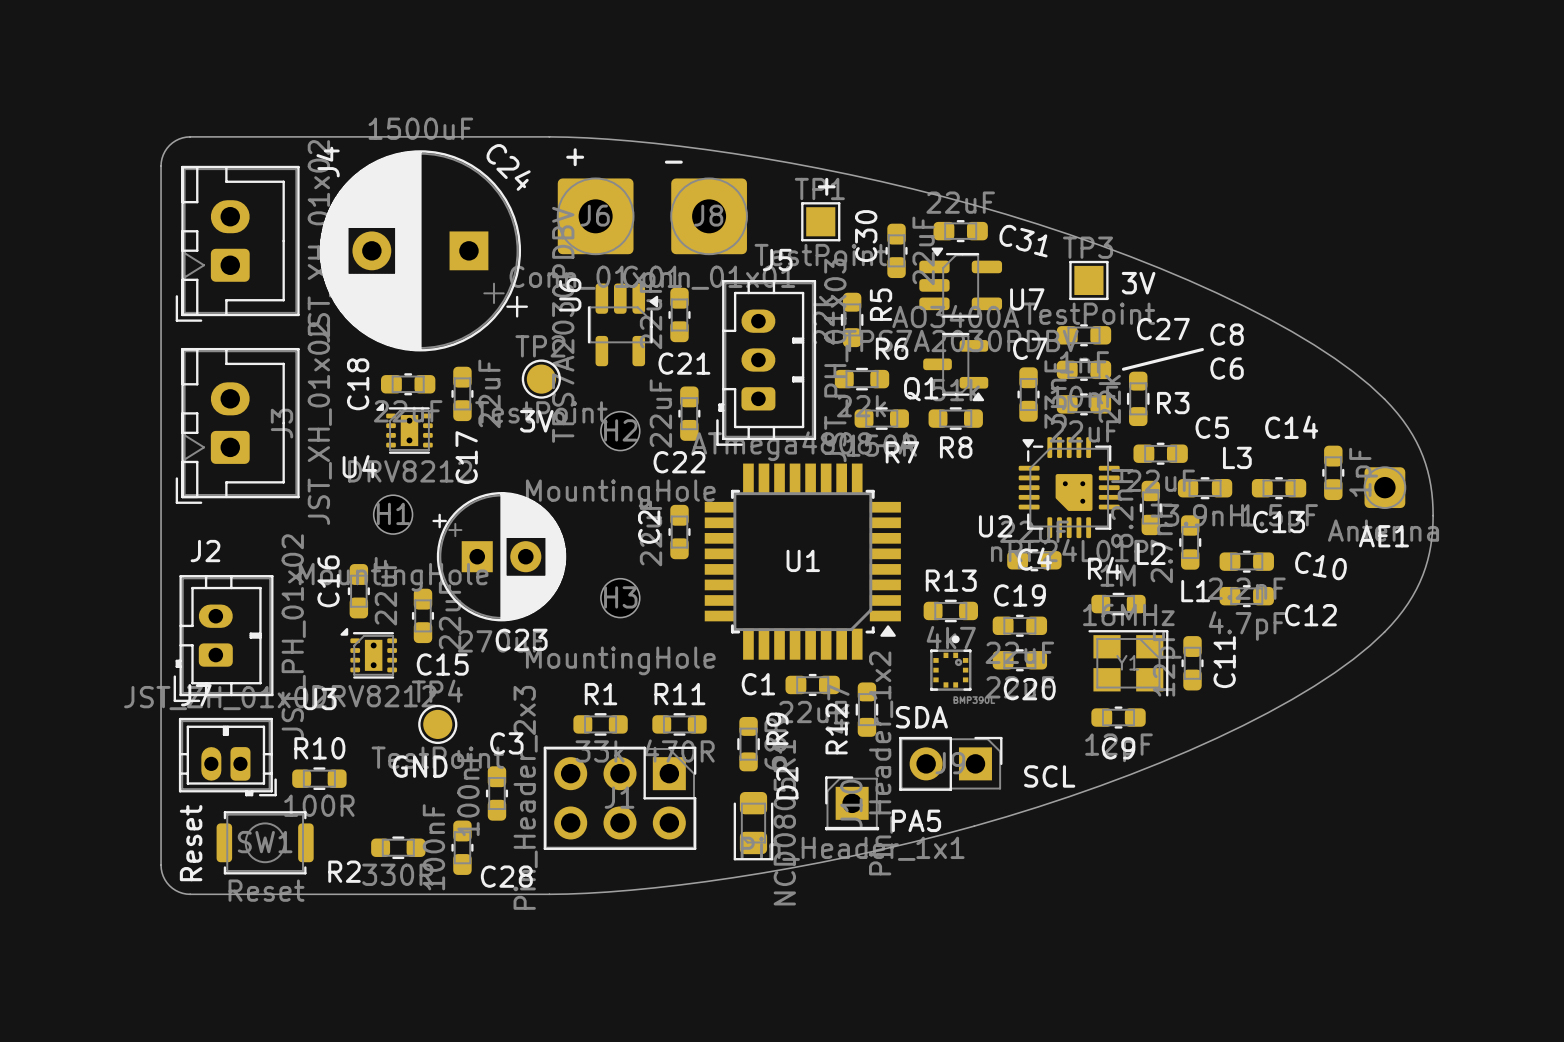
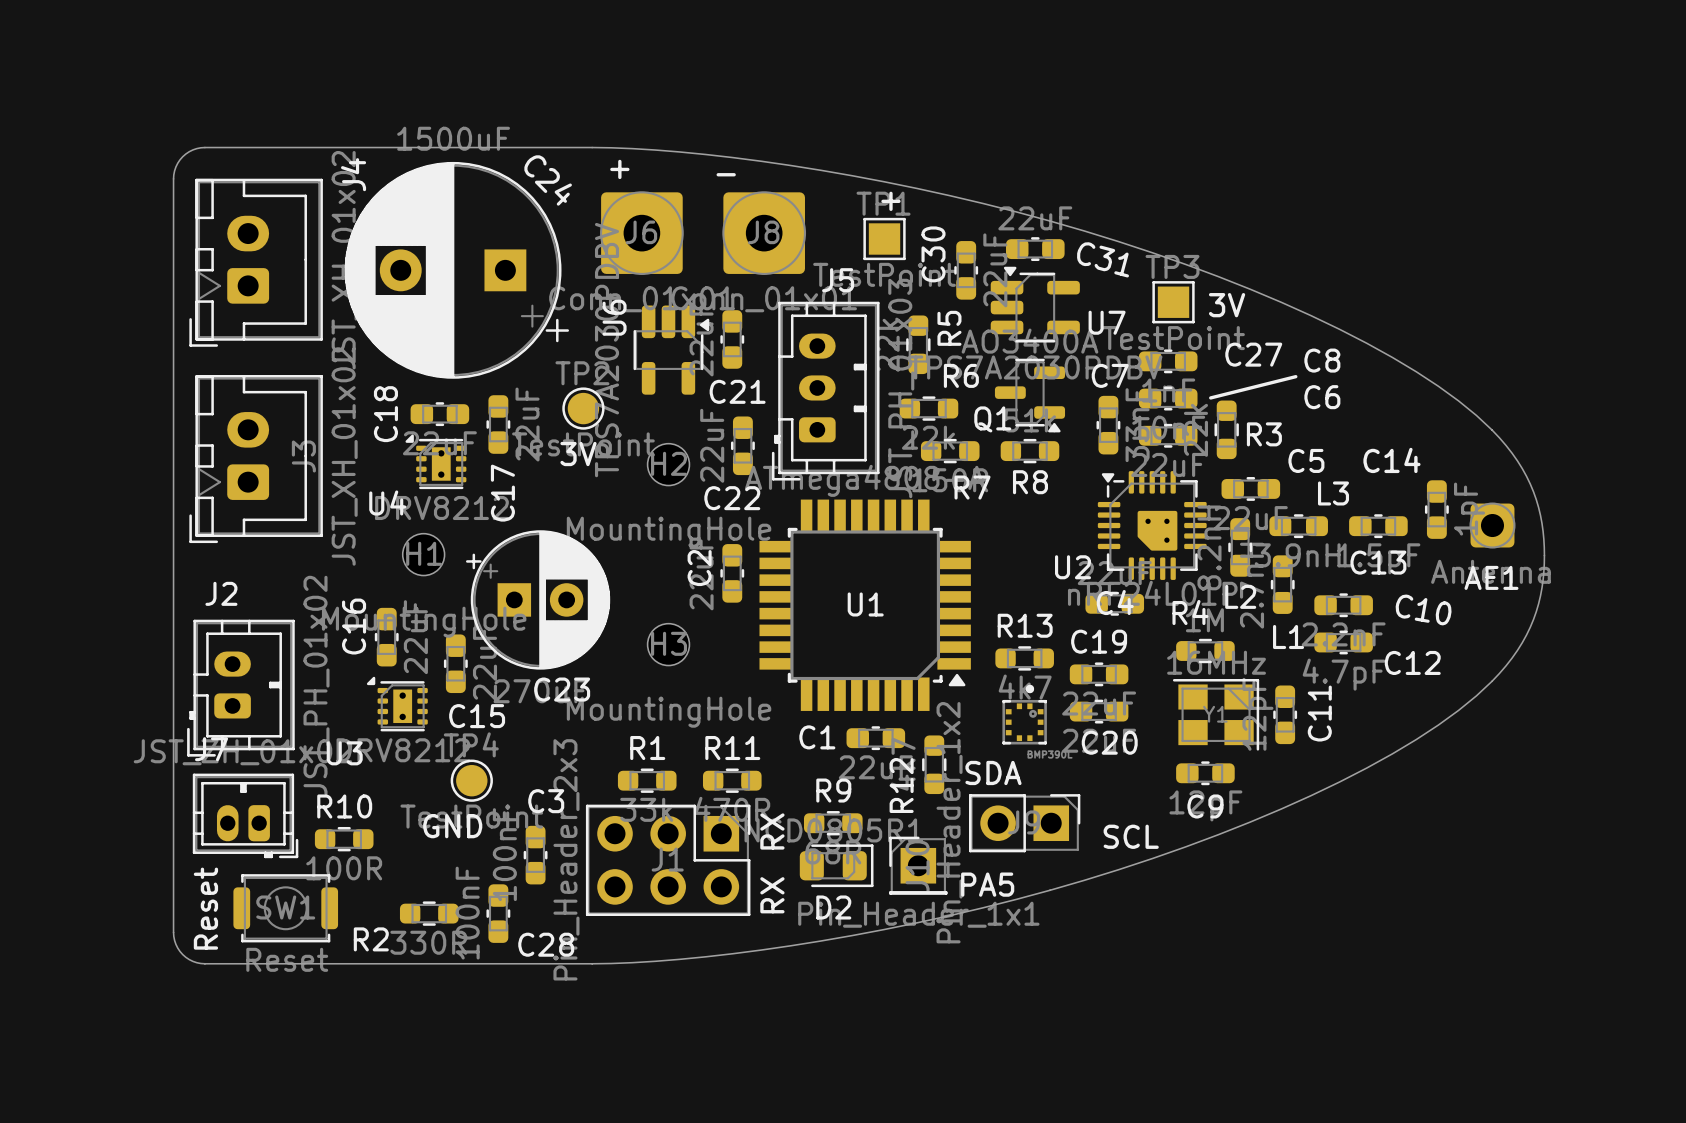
R9 rotation: 0° (748, 744) -> 90° clockwise (833, 823)
text: none -> RX (772, 831)
D2 name position: D2 (787, 783) -> D2 (833, 907)
D2 rotation: 0° (753, 826) -> 90° counterclockwise (836, 865)
text: none -> RX (772, 895)

